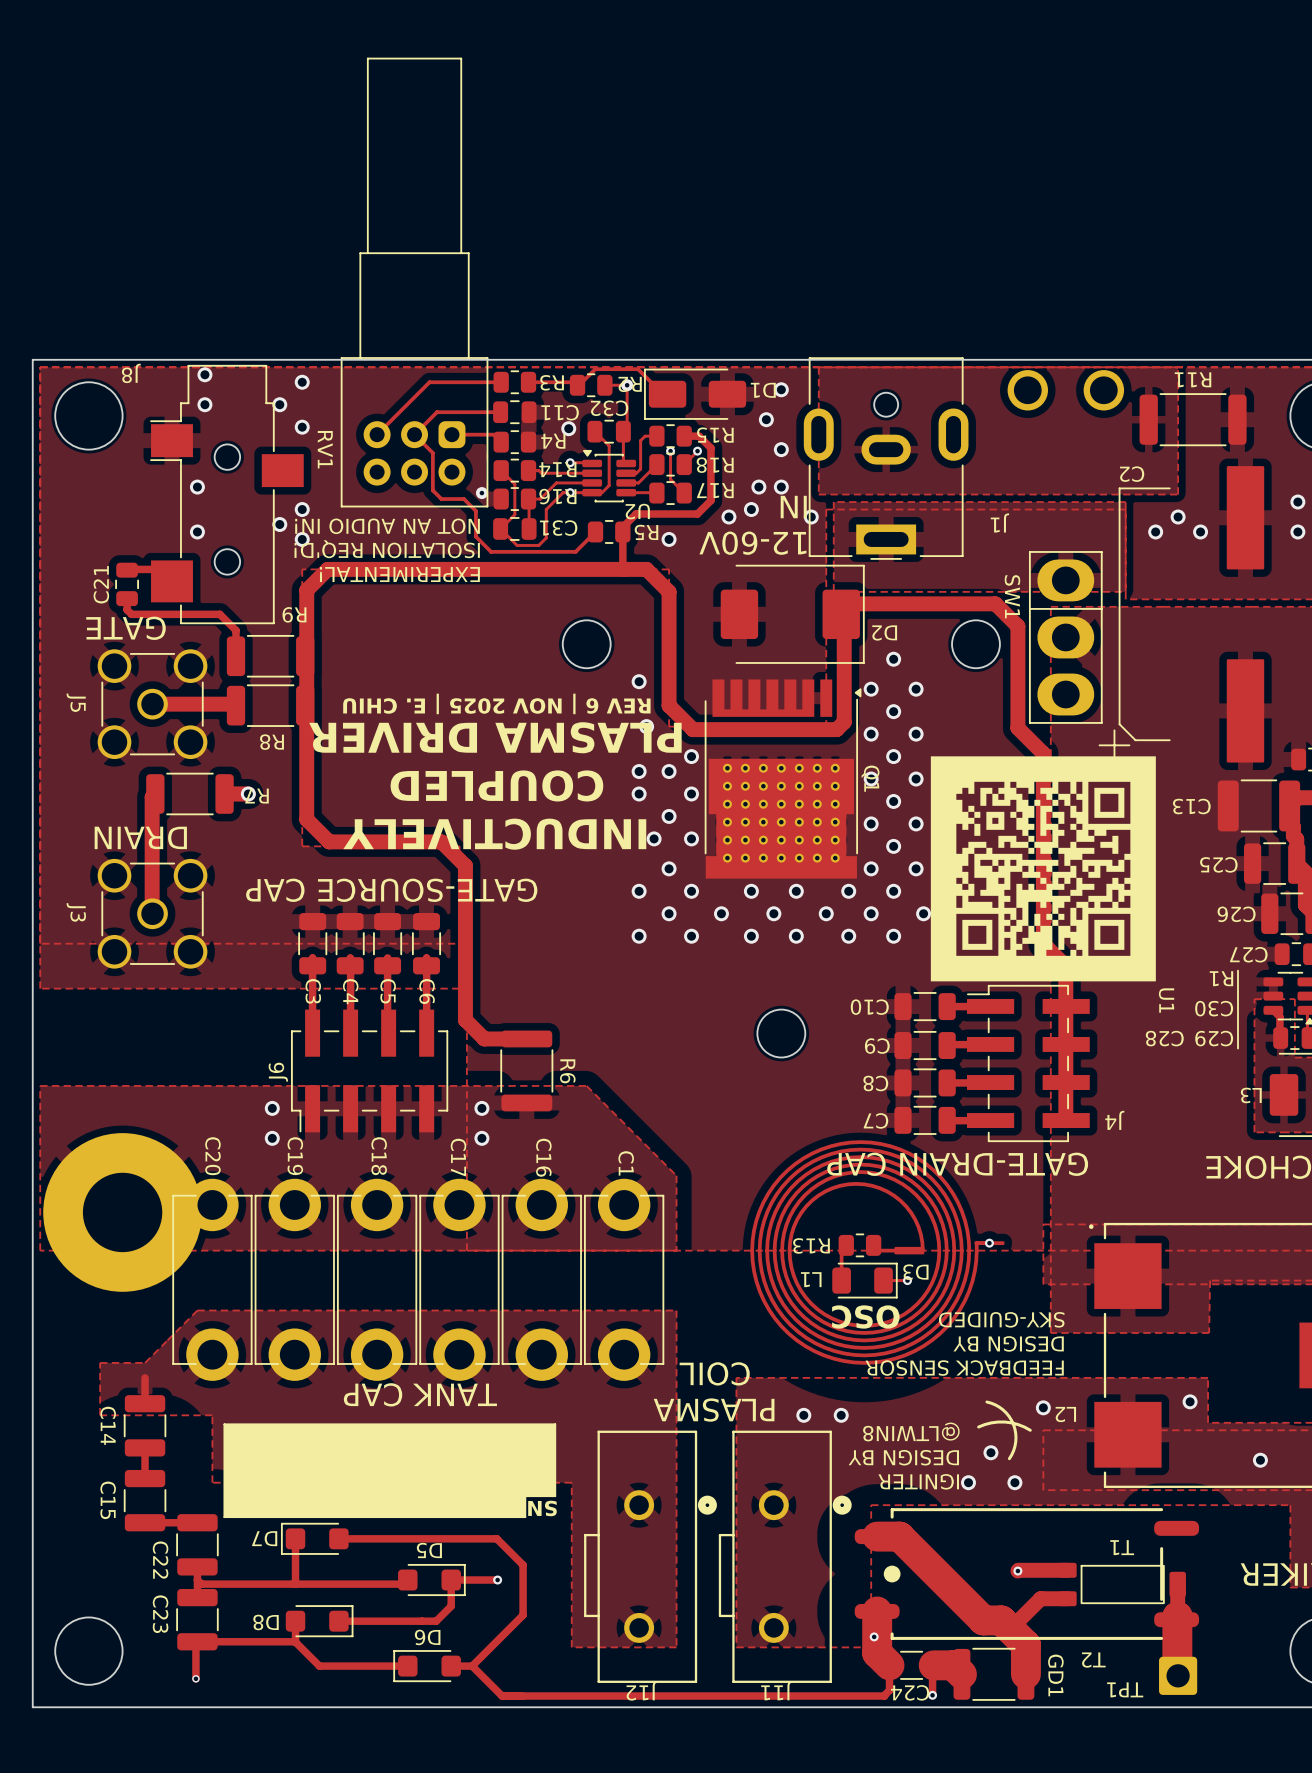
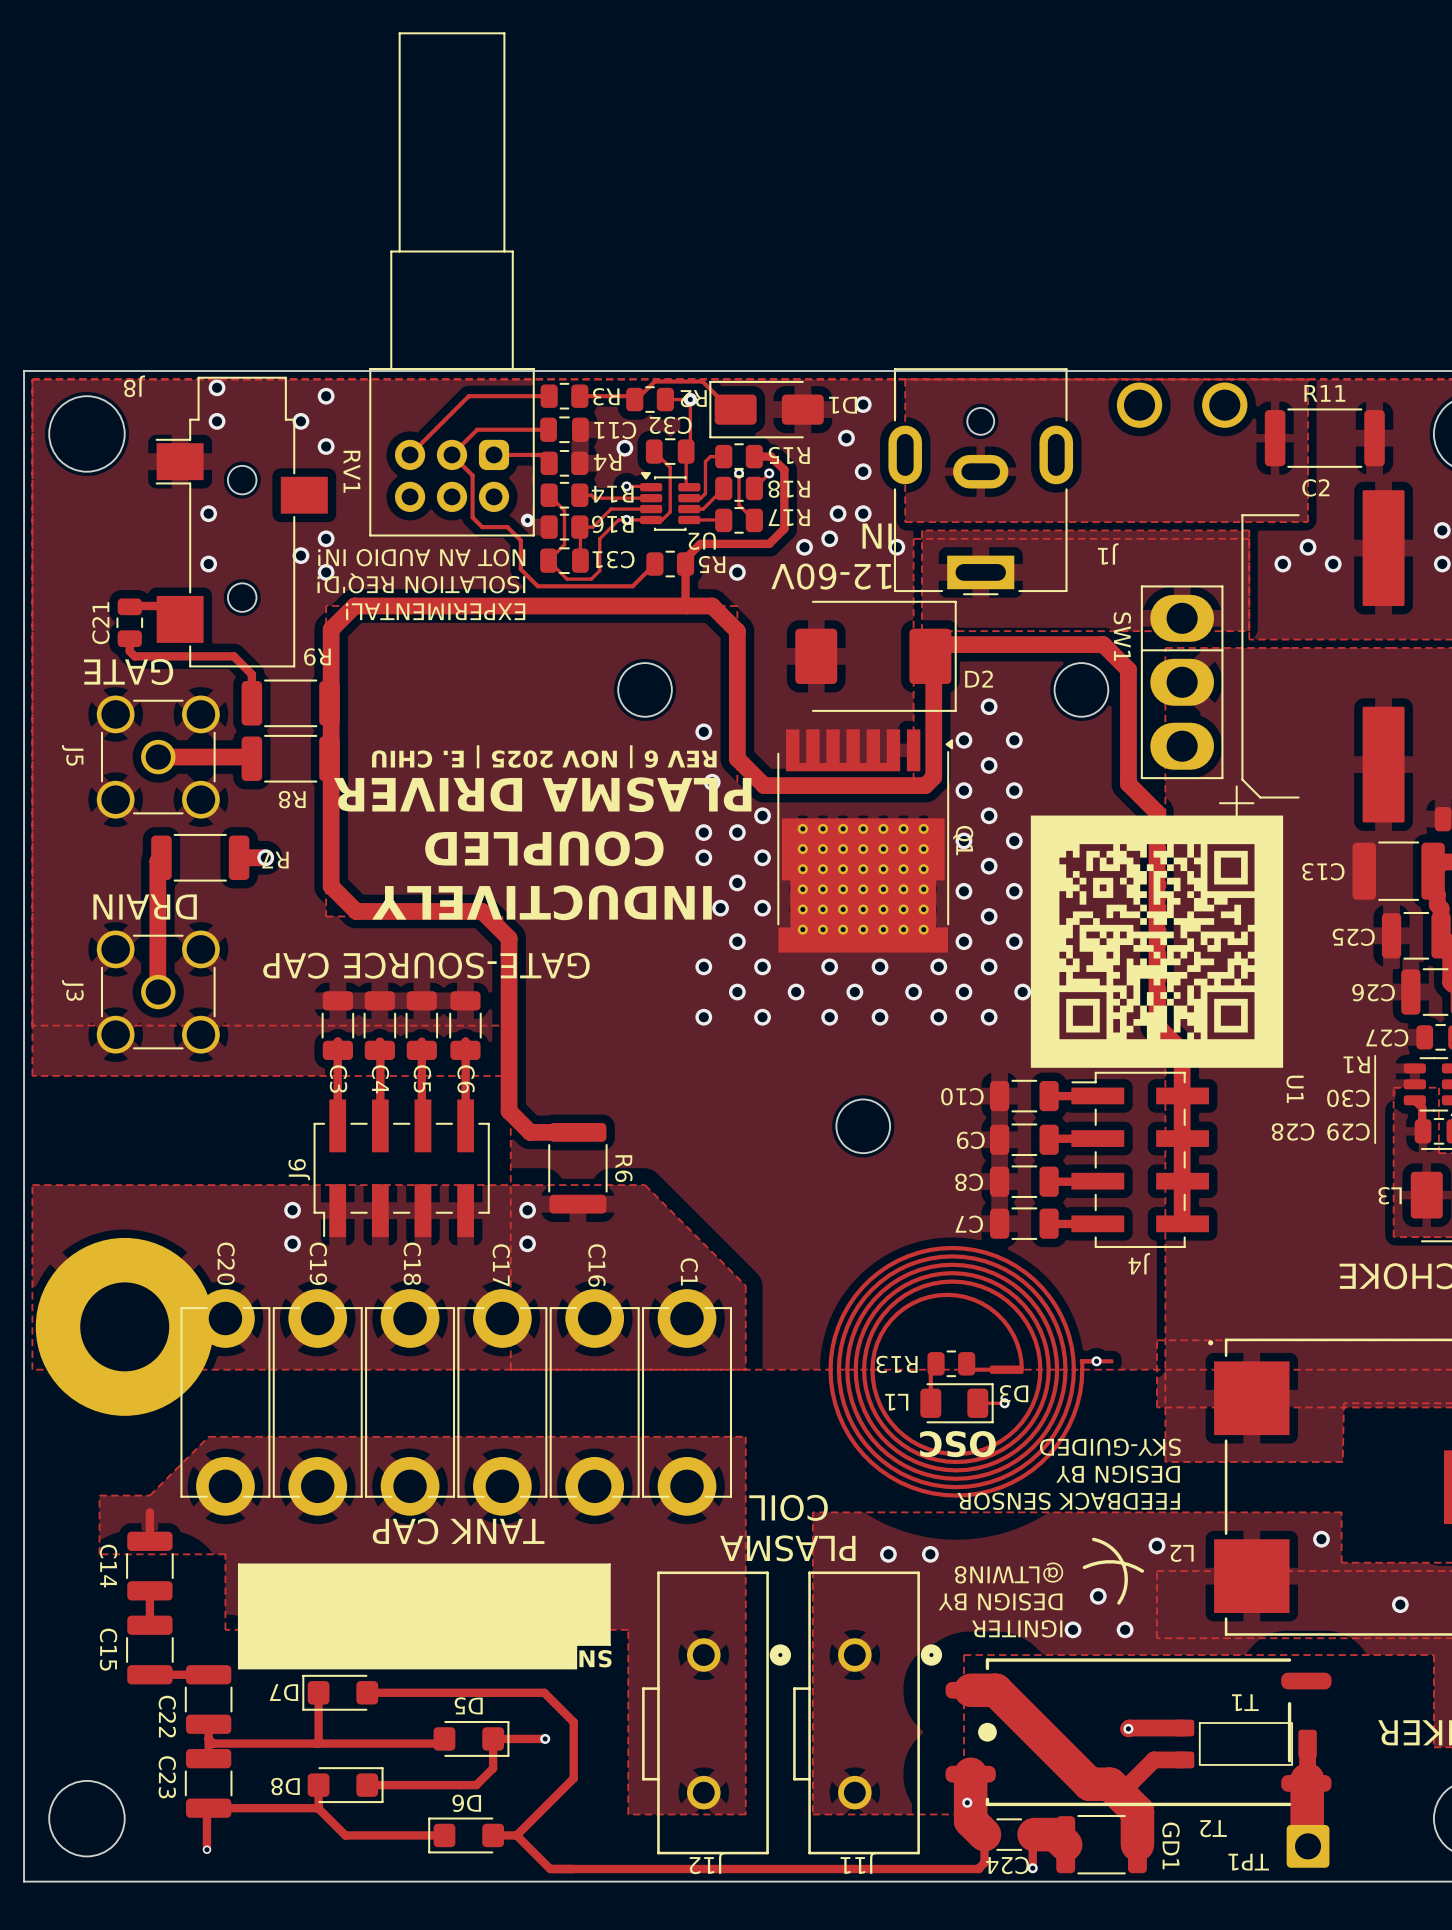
R11 name rotation: 0° (1193, 379) -> 180° (1324, 393)
C2 name rotation: 0° (1132, 474) -> 180° (1315, 487)
C2 name position: C2 (1132, 474) -> C2 (1315, 487)
D2 name rotation: 0° (884, 632) -> 180° (979, 679)
J4 name position: J4 (1114, 1120) -> J4 (1139, 1263)
text: GATE-DRAIN CAP (957, 1164) -> none

